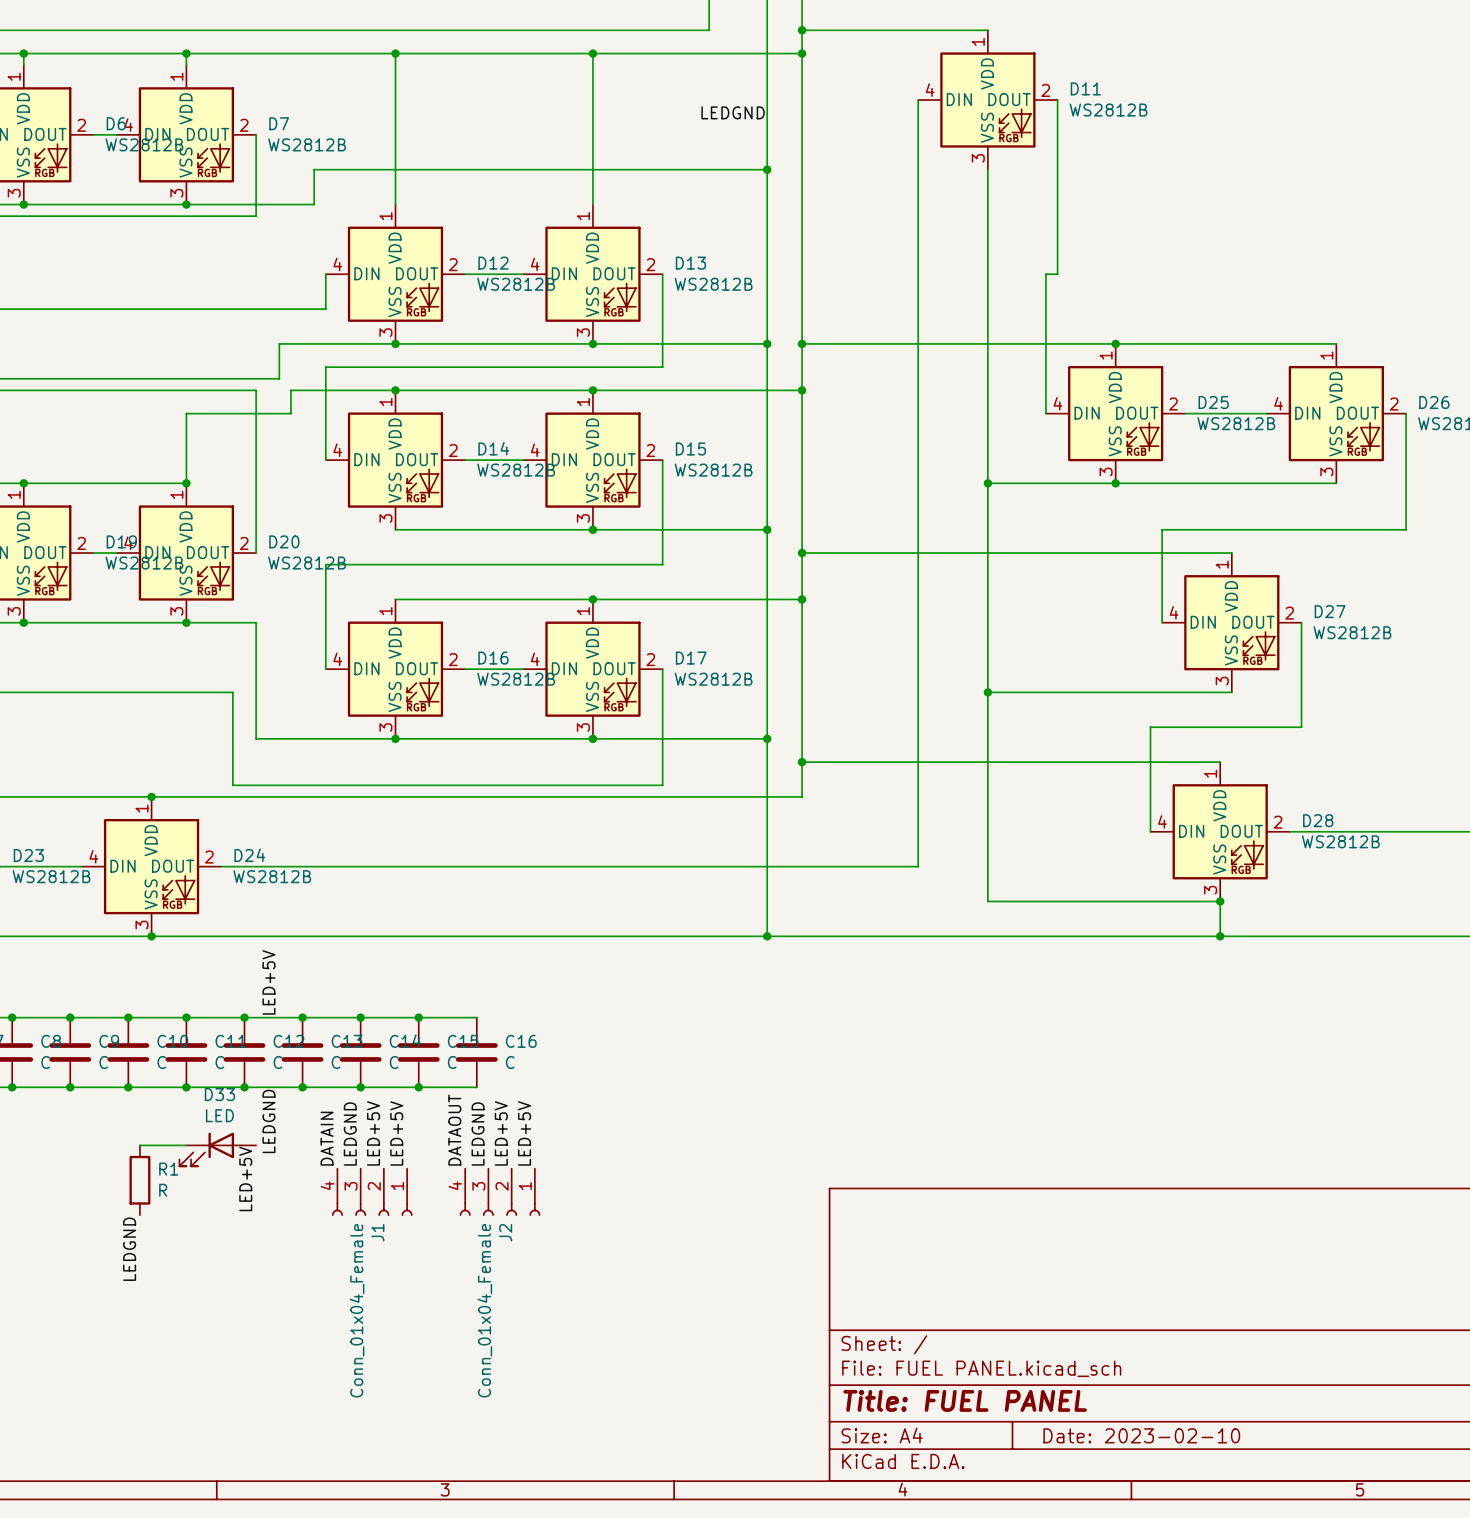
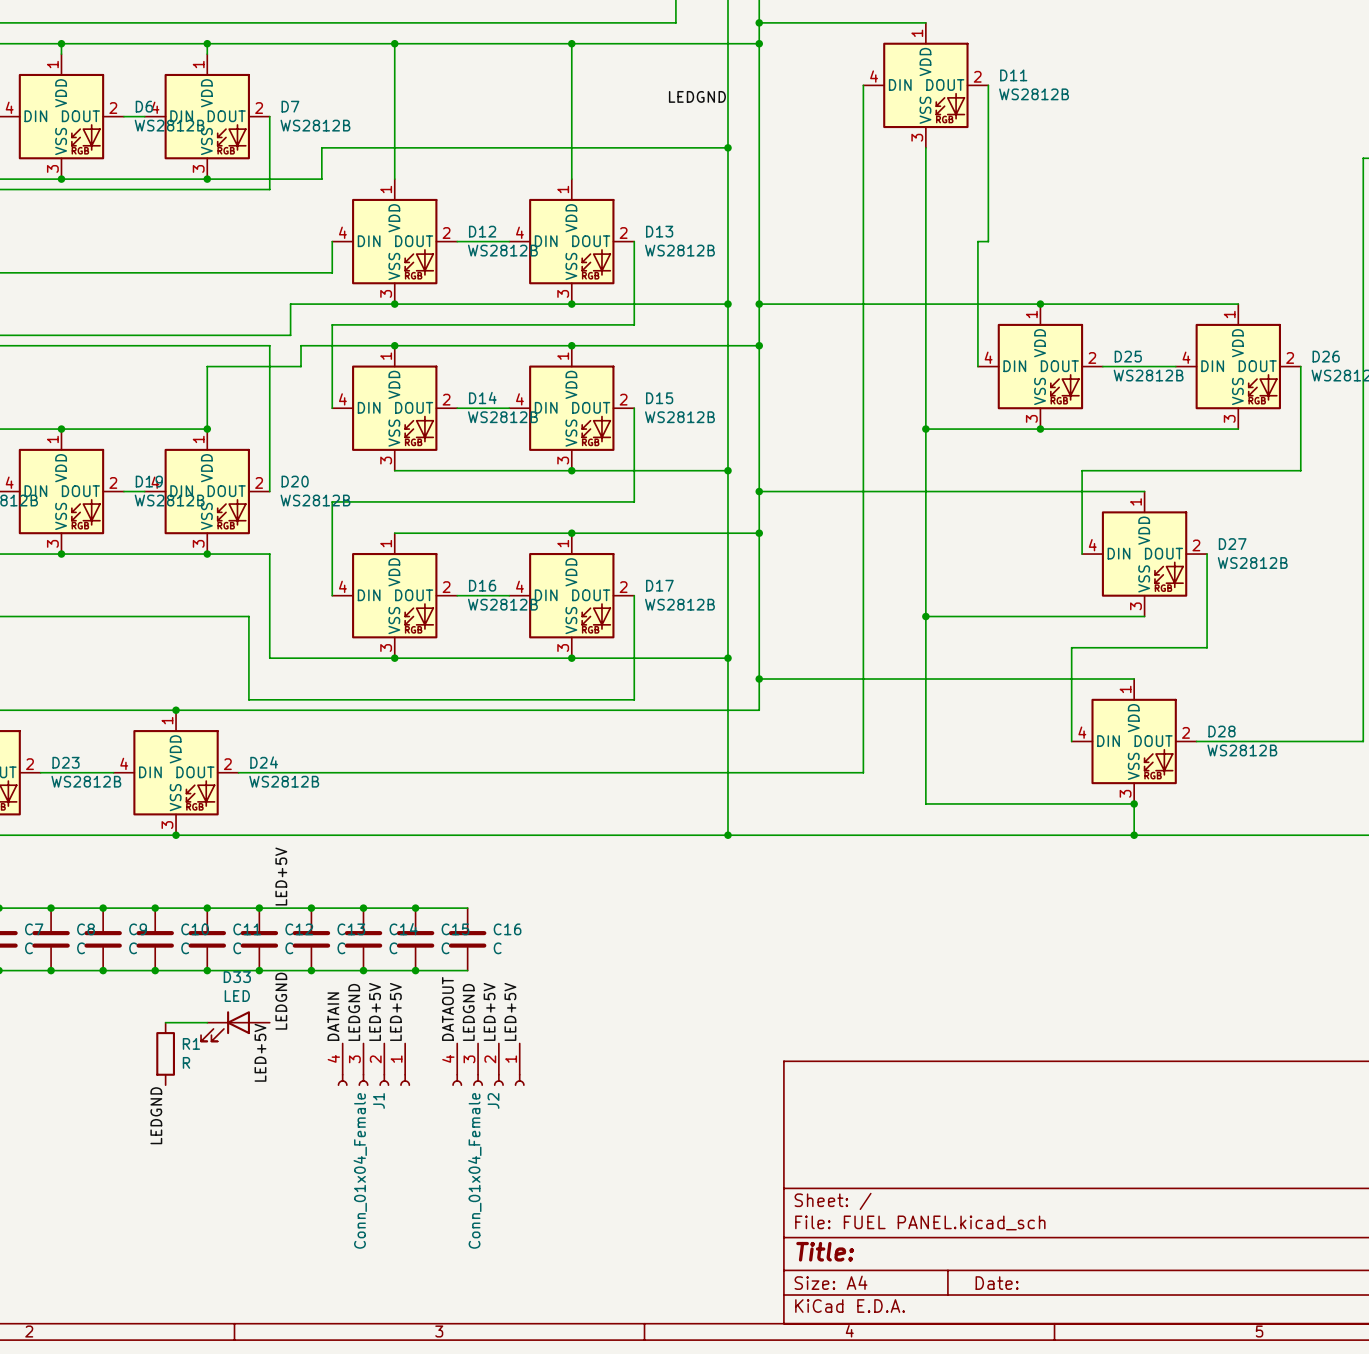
title block: Title: FUEL PANEL (965, 1400) -> Title: (825, 1251)
title block: Date: 2023-02-10 (1141, 1435) -> Date: (997, 1283)

